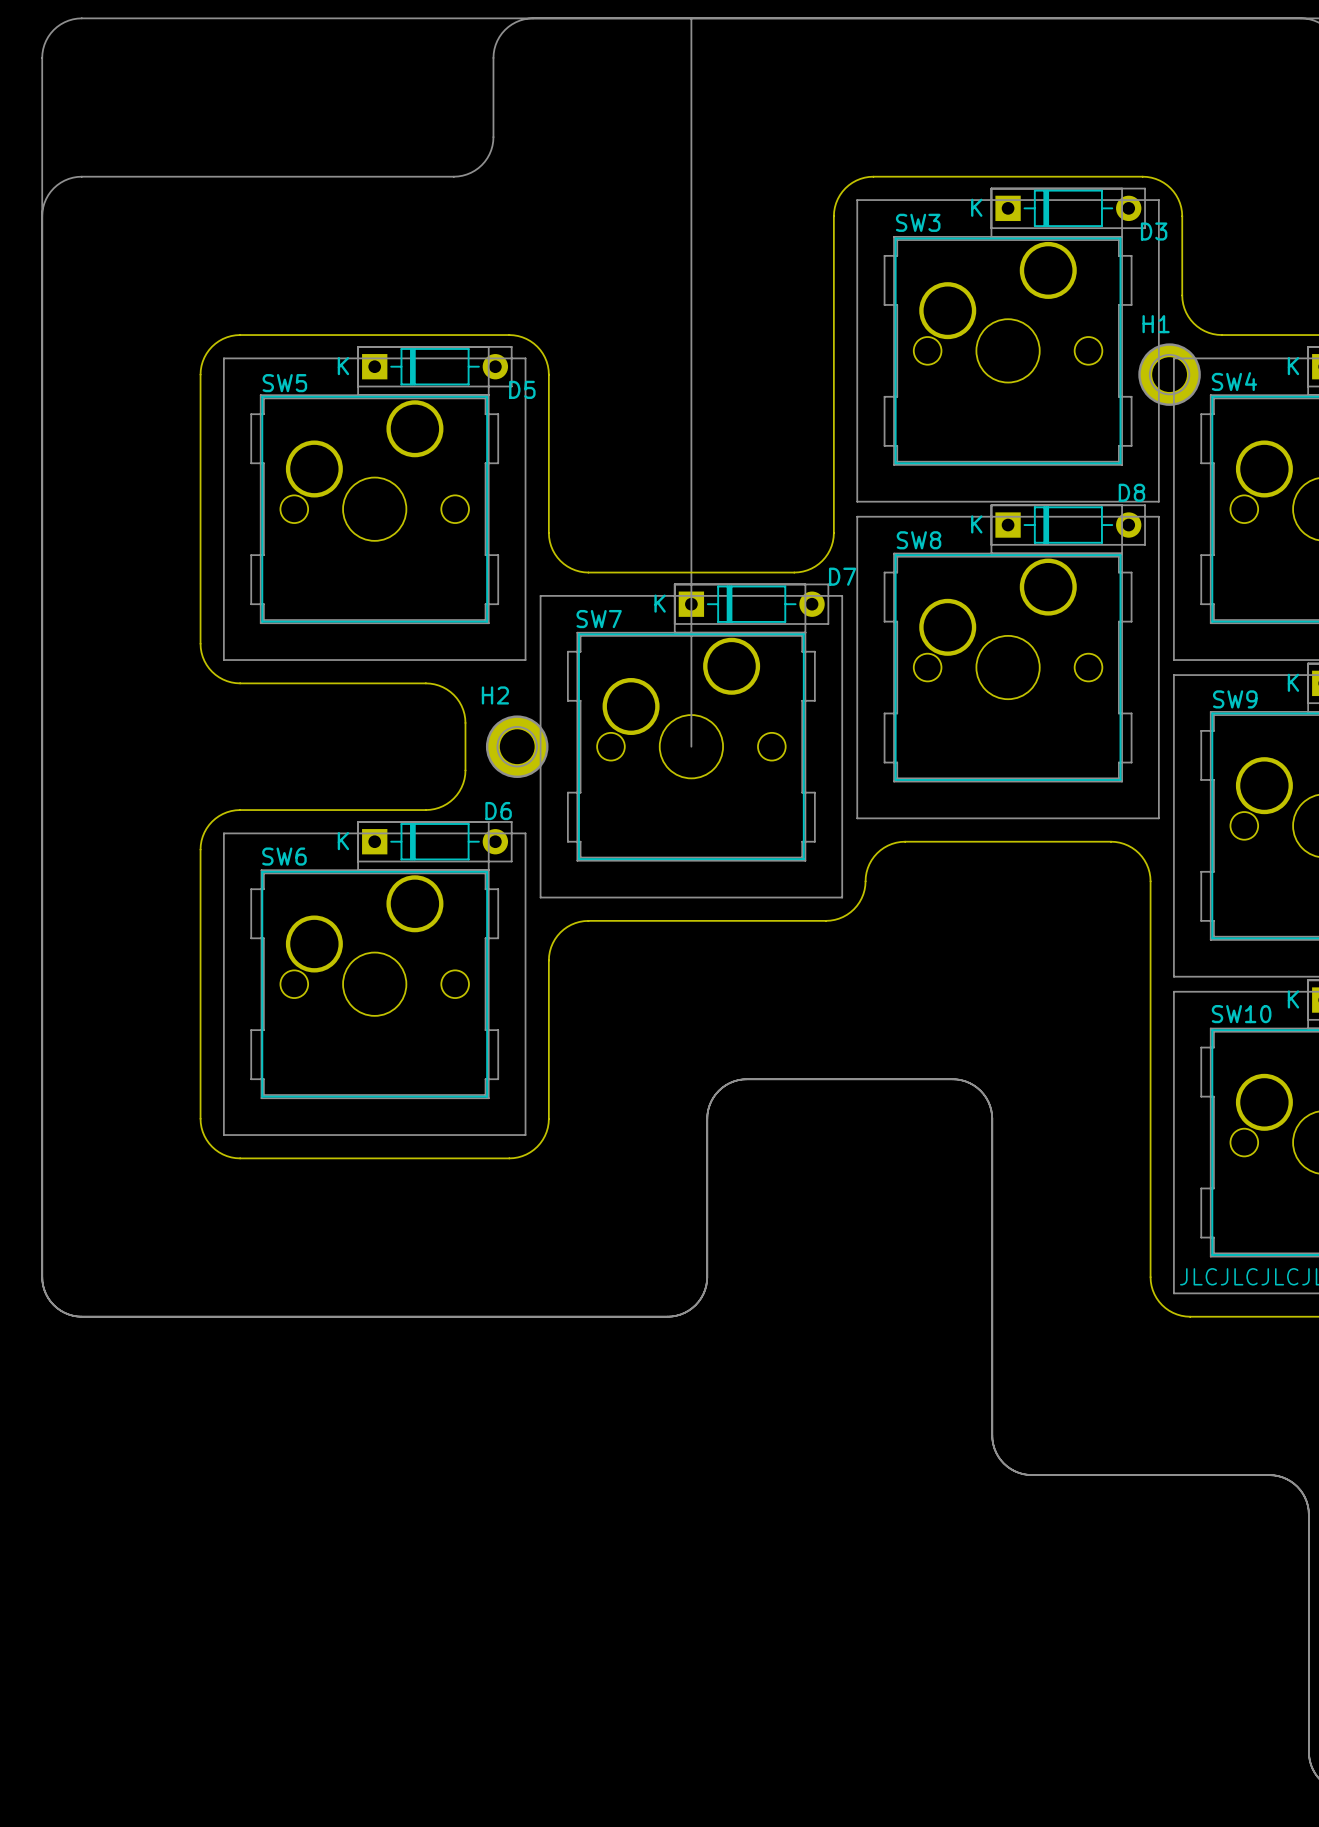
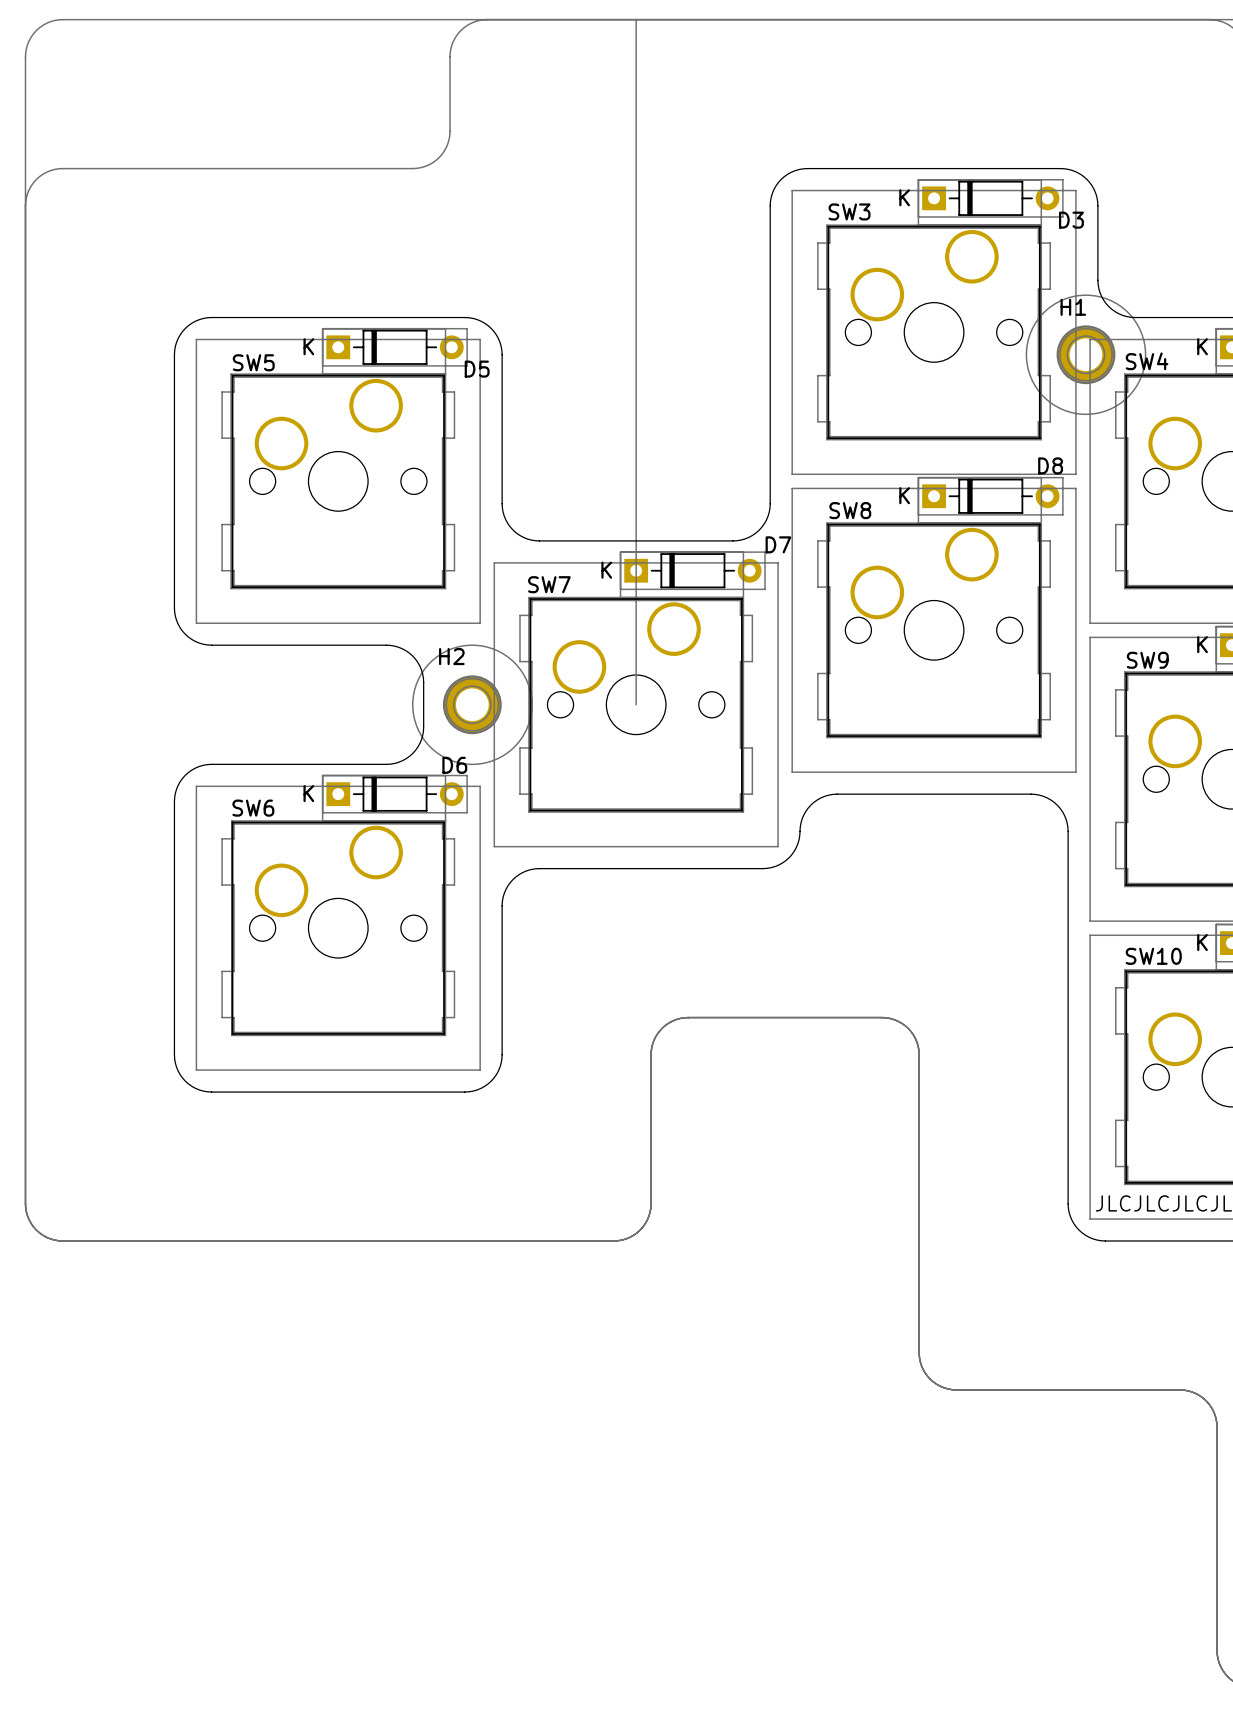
drawing: none -> [1025, 294, 1147, 416]
drawing: none -> [412, 644, 533, 766]

